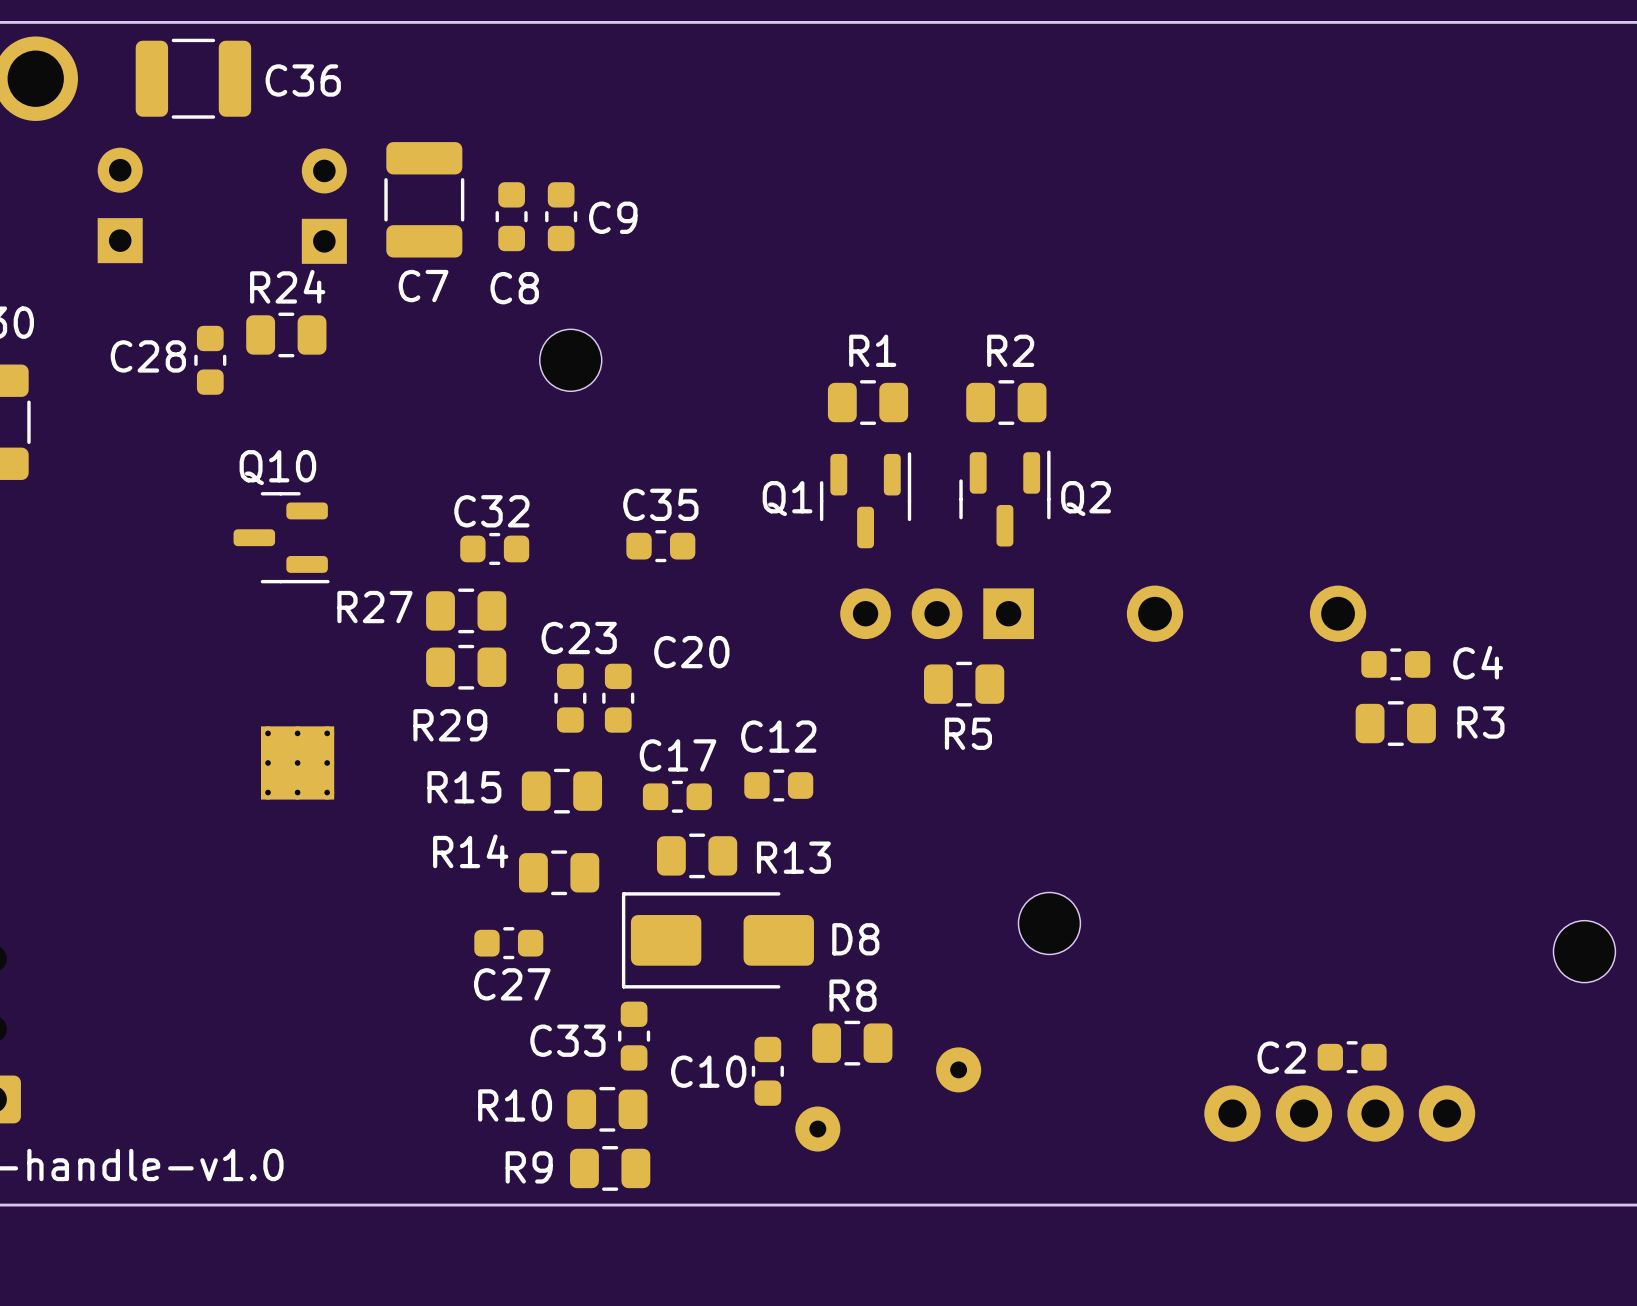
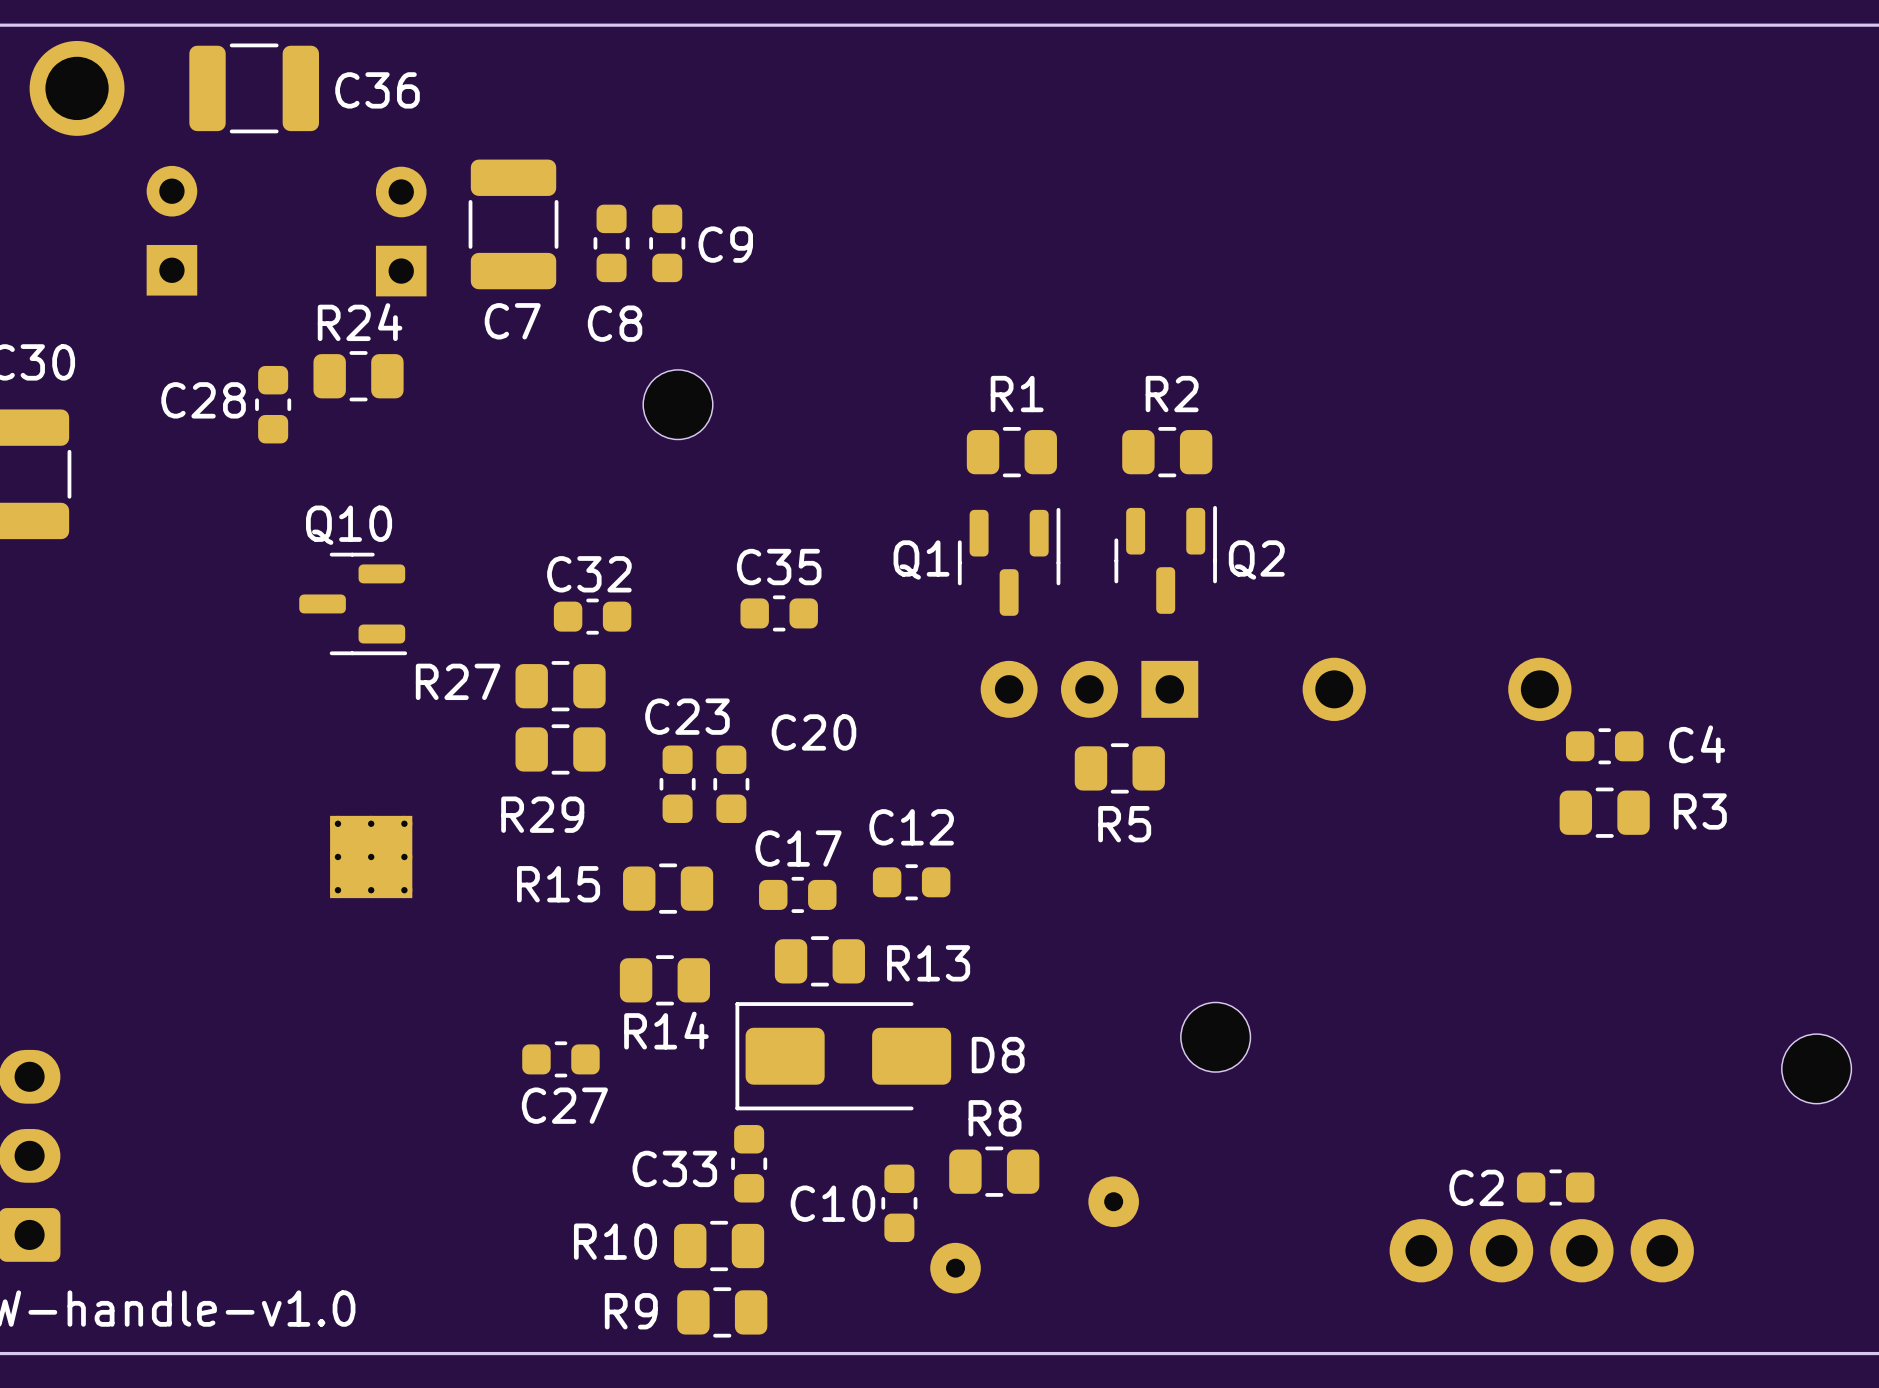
R14 name position: R14 (470, 851) -> R14 (666, 1030)
C27 position: (508, 943) -> (560, 1059)

